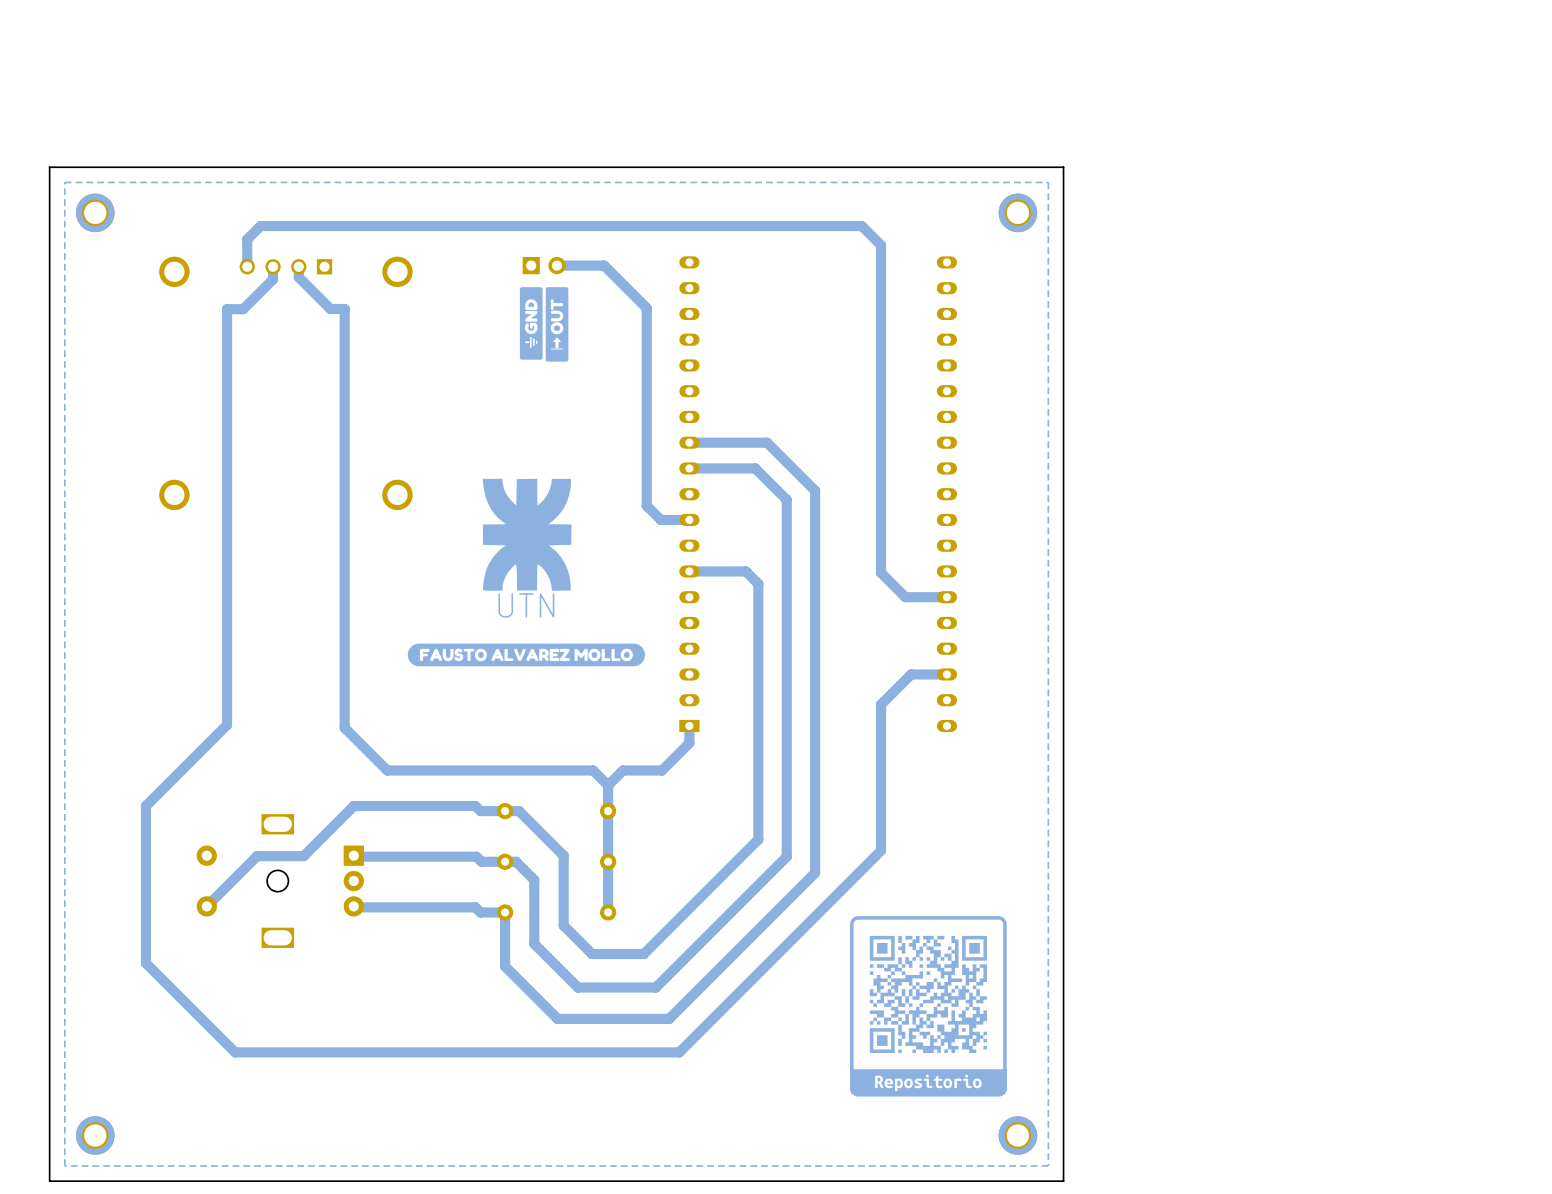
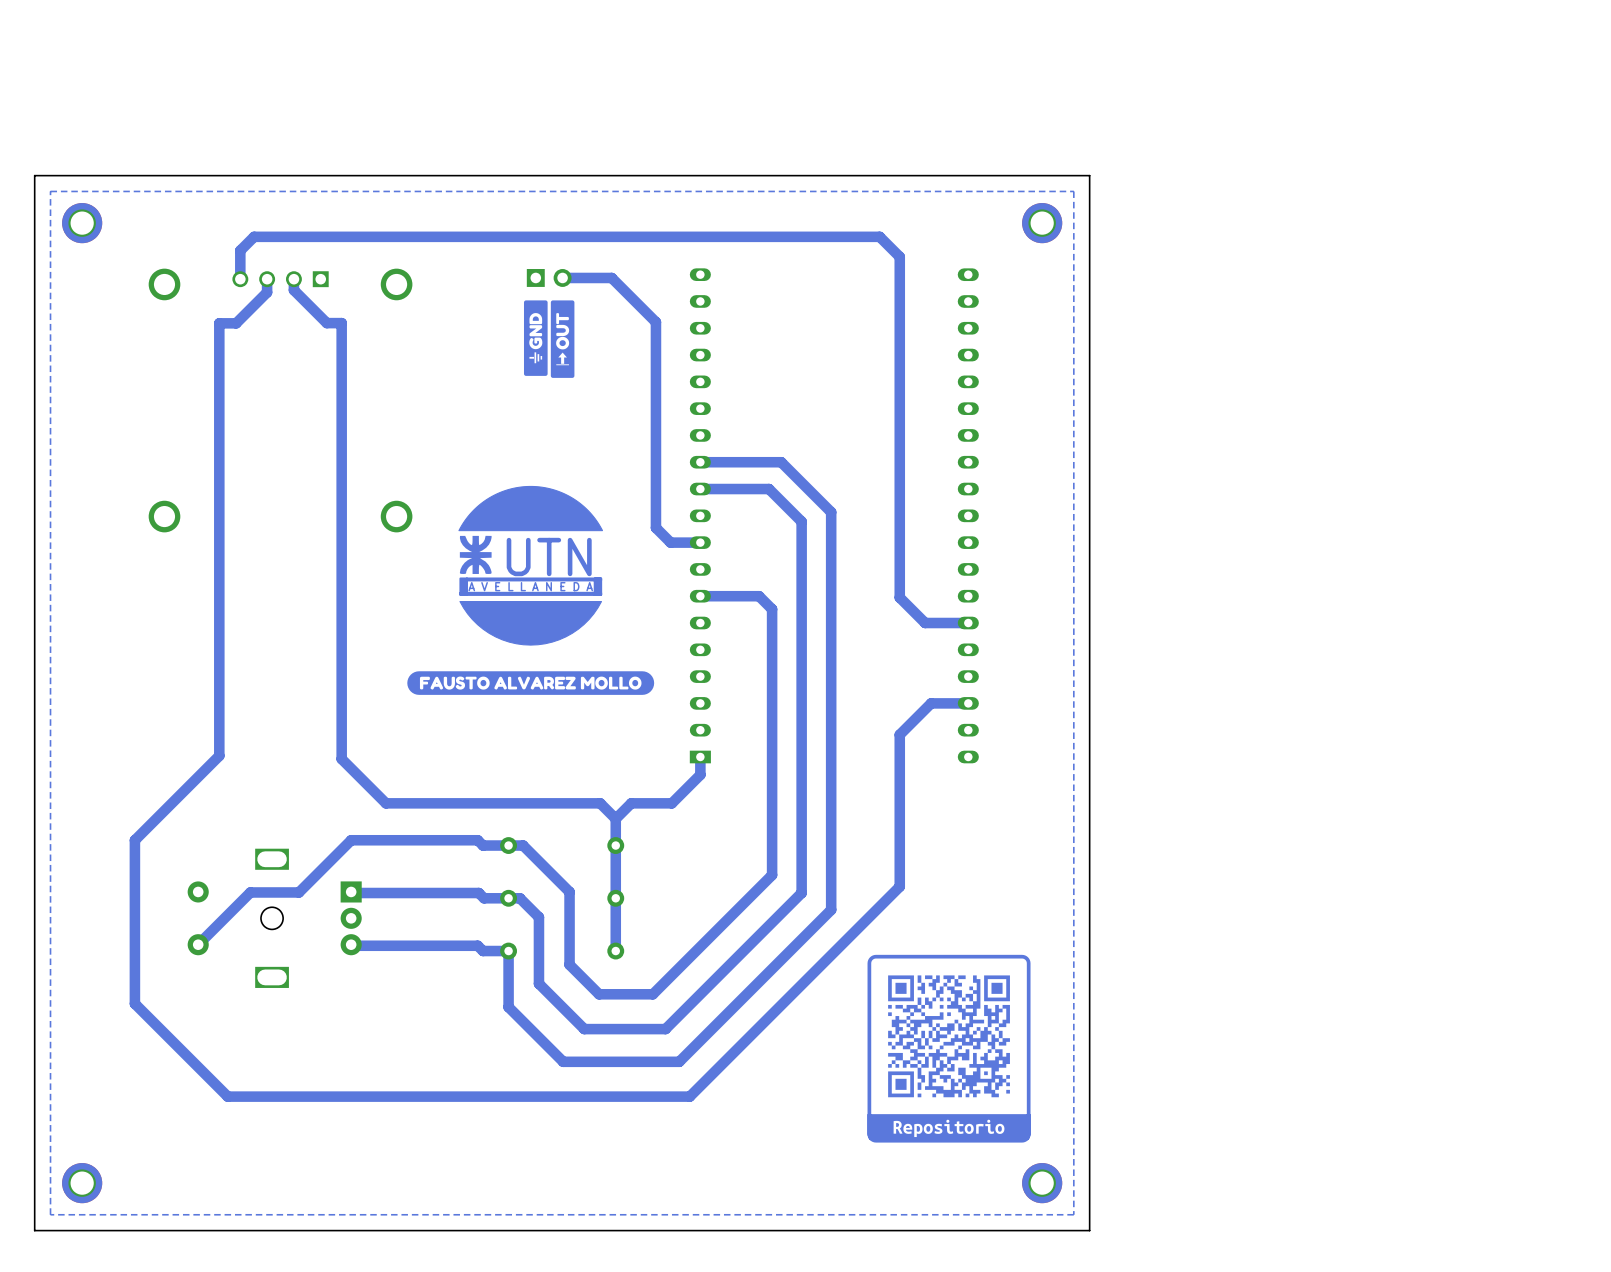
drawing shape: [482, 478, 572, 618] -> [458, 485, 604, 646]

